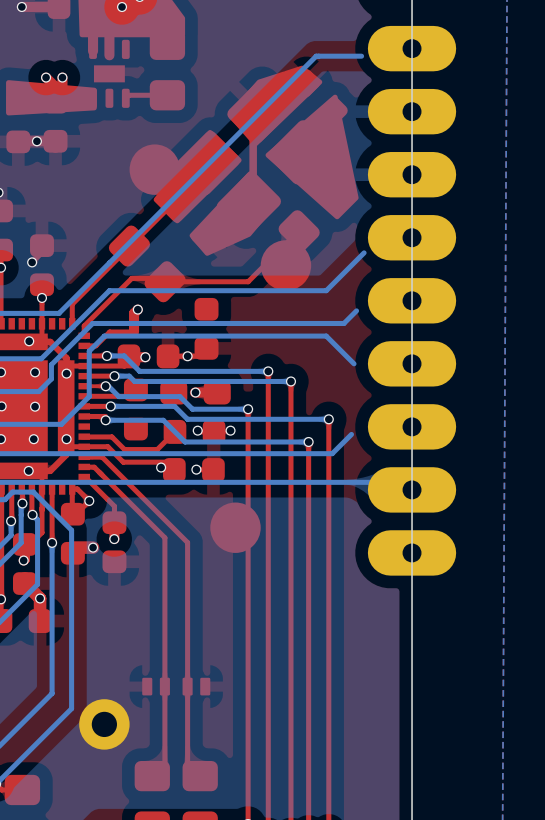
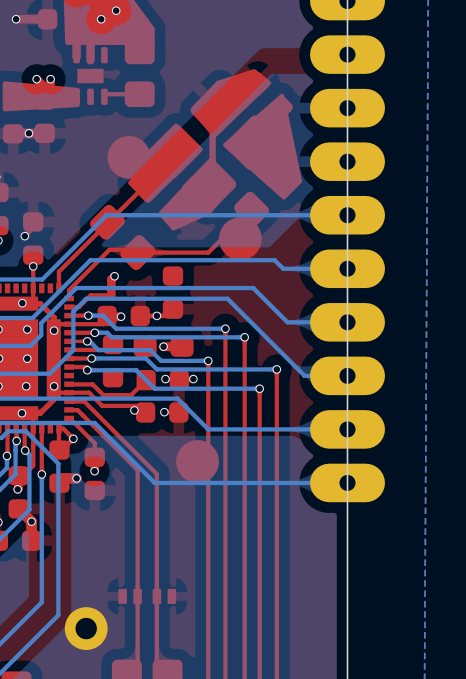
bottom track: (361, 56) (316, 56) (58, 313) (52, 313) -> (347, 215) (106, 215) (42, 279)
bottom track: (364, 252) (326, 290) -> (347, 268) (283, 268) (274, 260)
bottom track: (356, 310) (343, 323) (301, 323) -> (347, 322) (287, 322) (253, 288)
bottom track: (270, 336) (326, 336) (354, 363) -> (227, 298) (304, 375) (347, 375)
bottom track: (351, 434) (332, 453) (211, 453) -> (347, 429) (208, 429) (177, 398)
bottom track: (114, 482) (401, 482) (409, 489) -> (94, 422) (154, 482) (347, 482)

